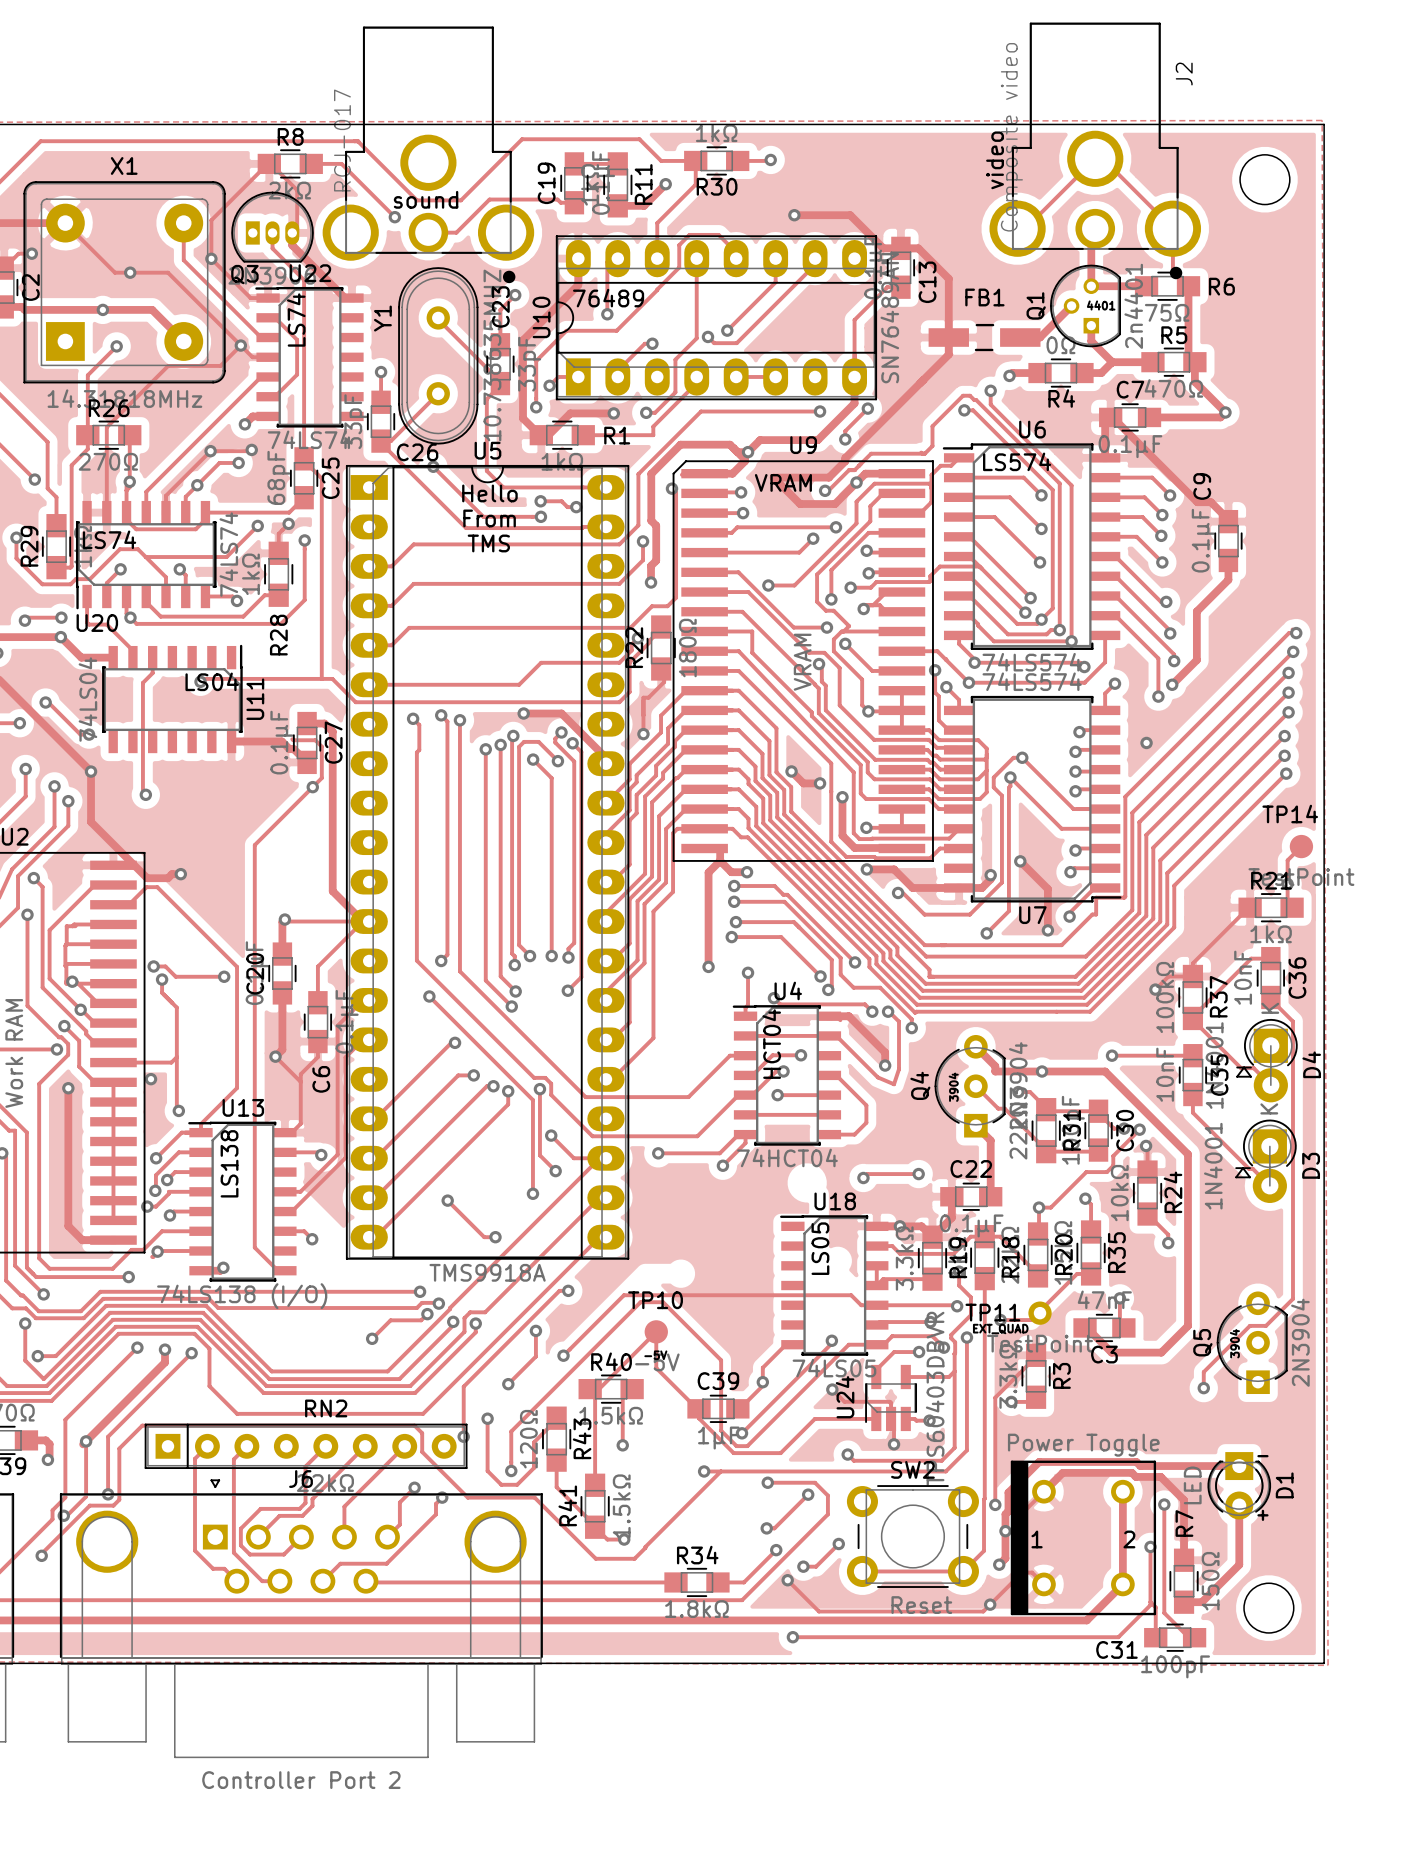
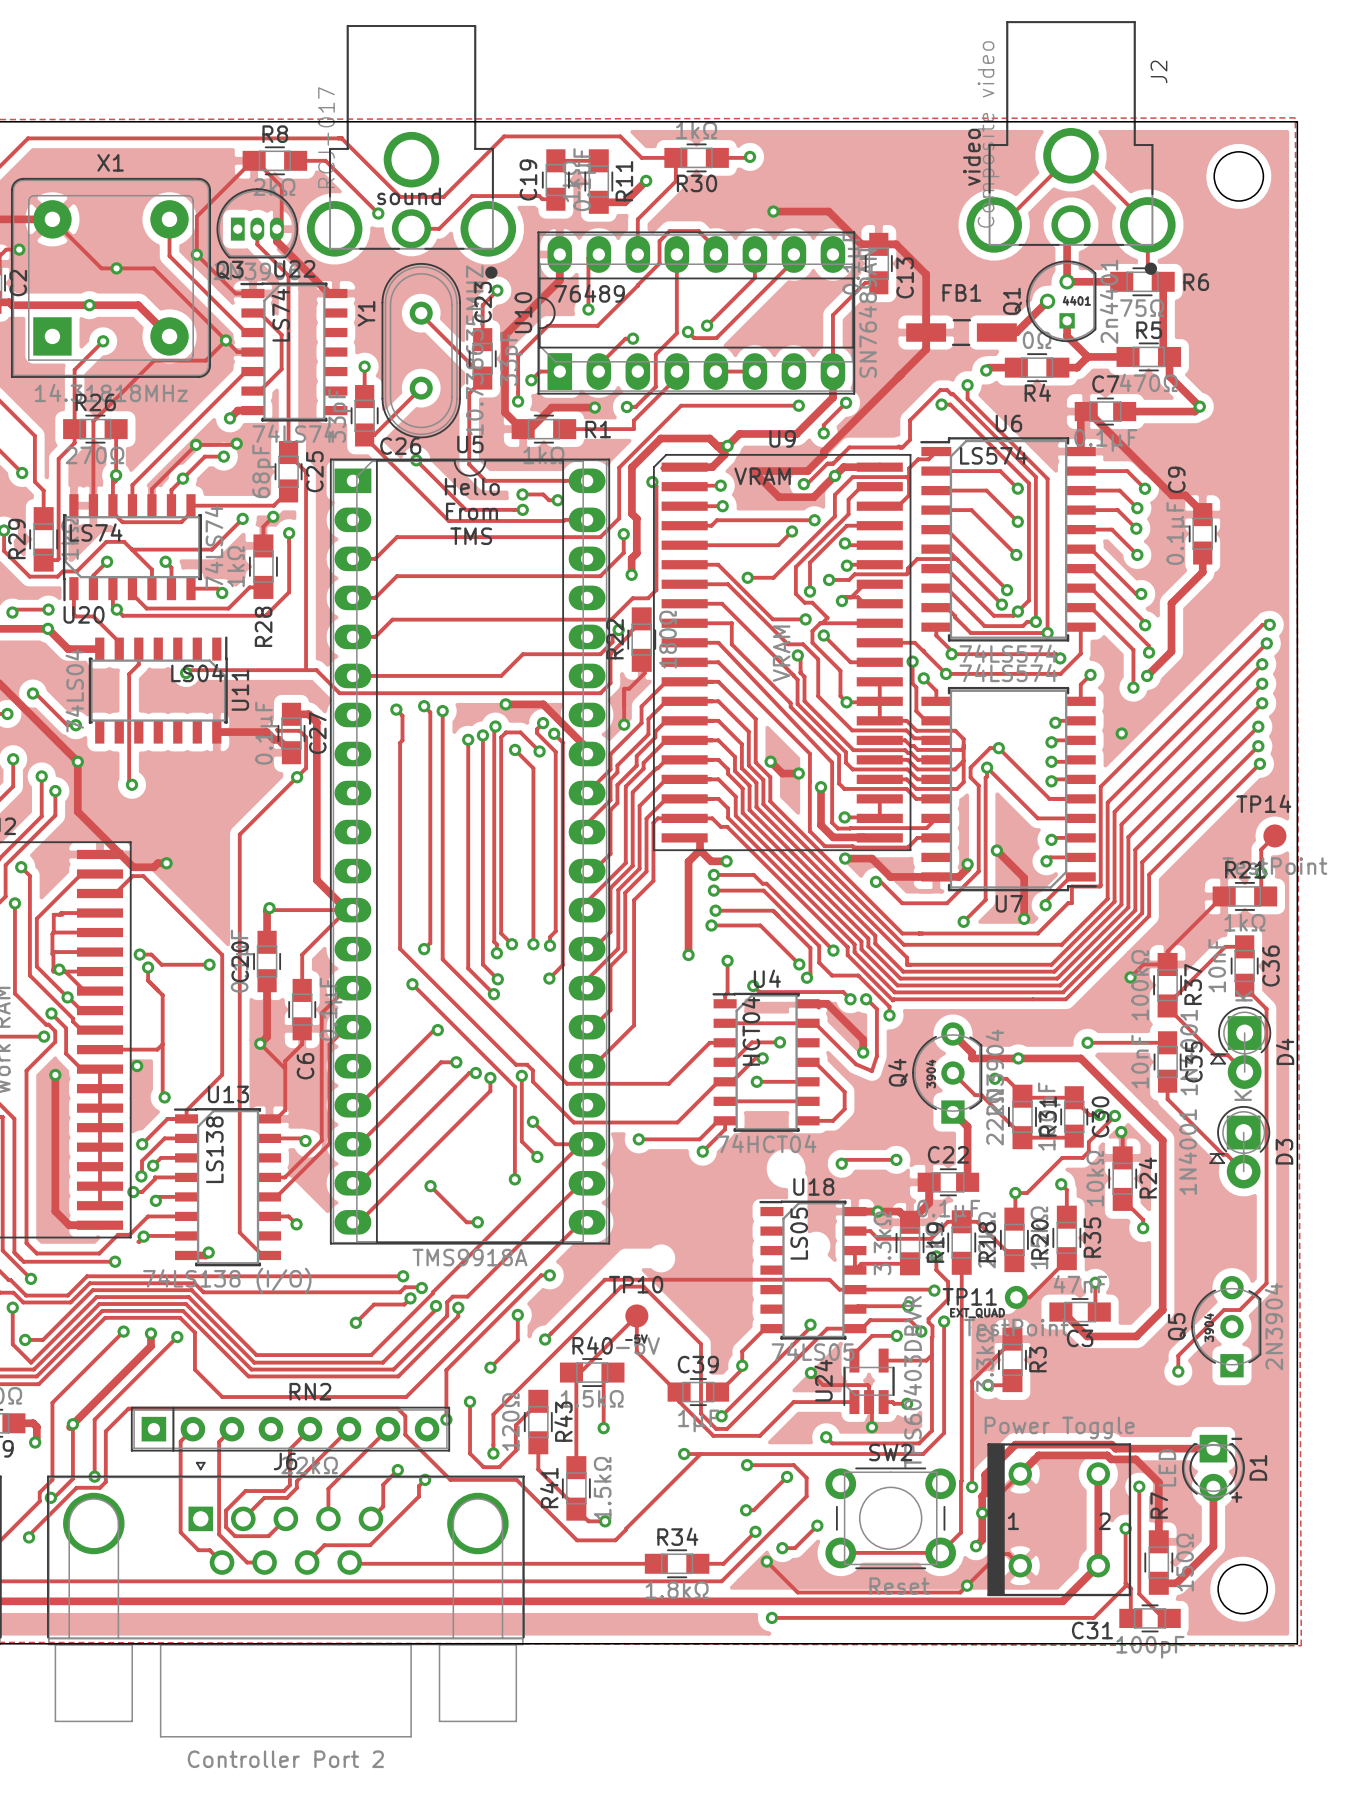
track: (1091, 1273) (1077, 1273) (1030, 1320) (1000, 1320) -> (1066, 1258) (1029, 1297) (1016, 1297)
via: (1000, 1320) -> none

